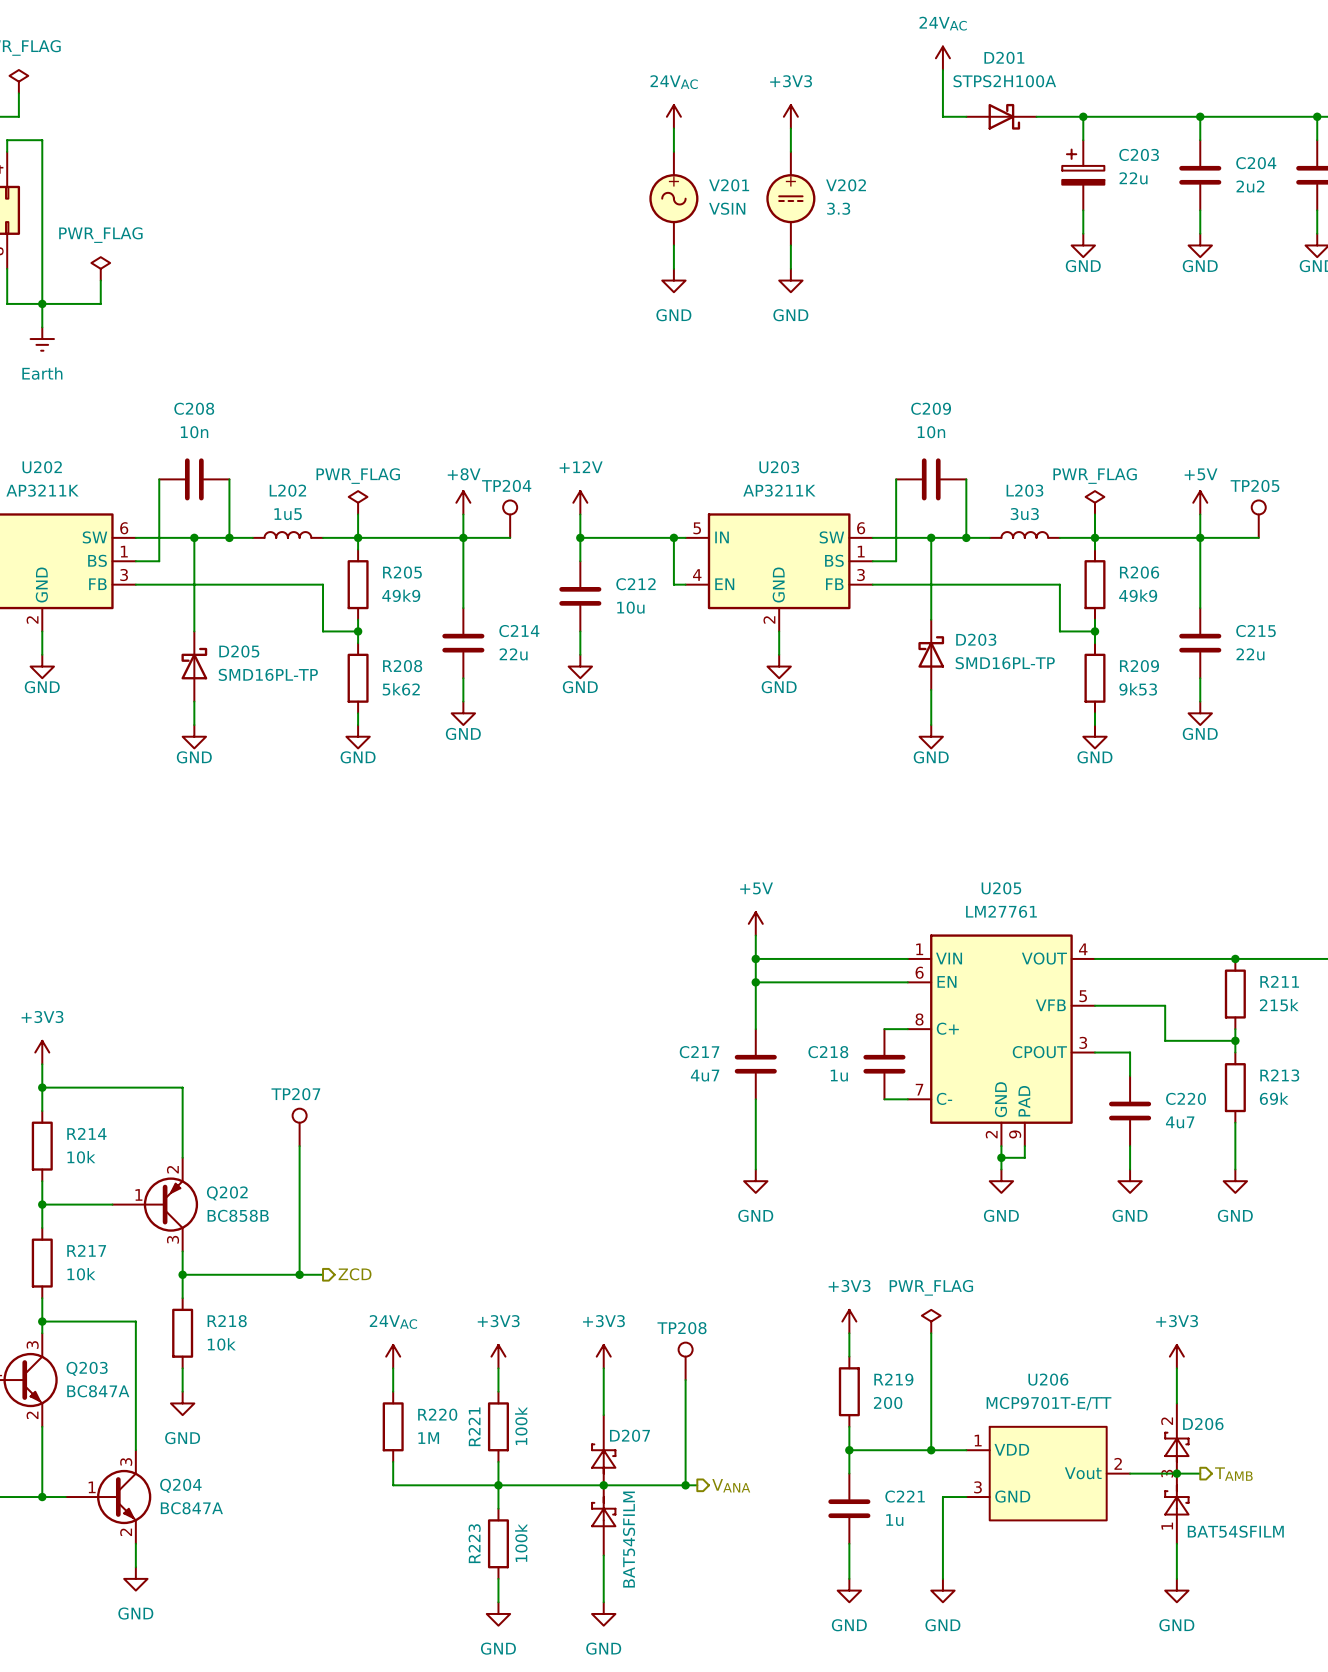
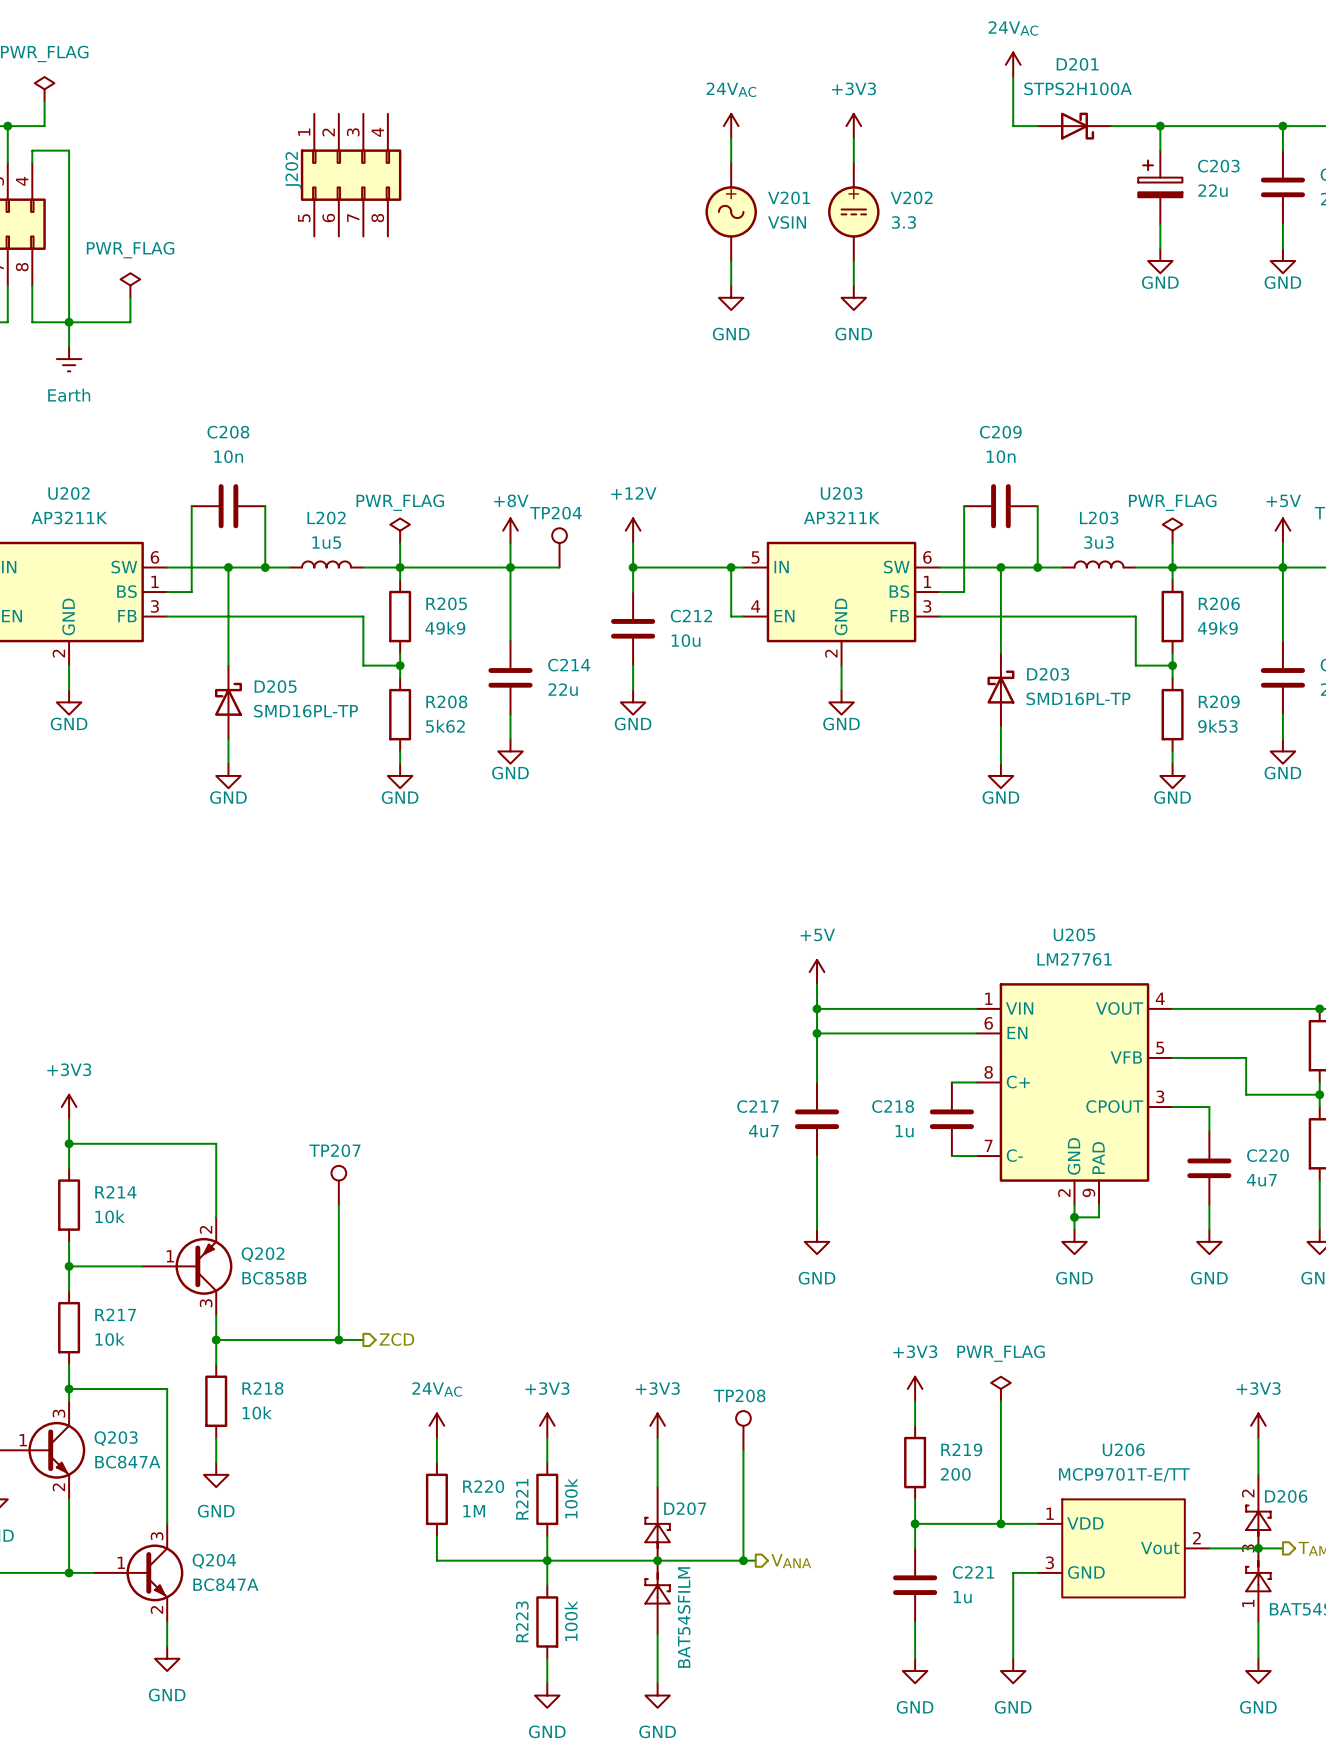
J202: none -> (351, 175)

